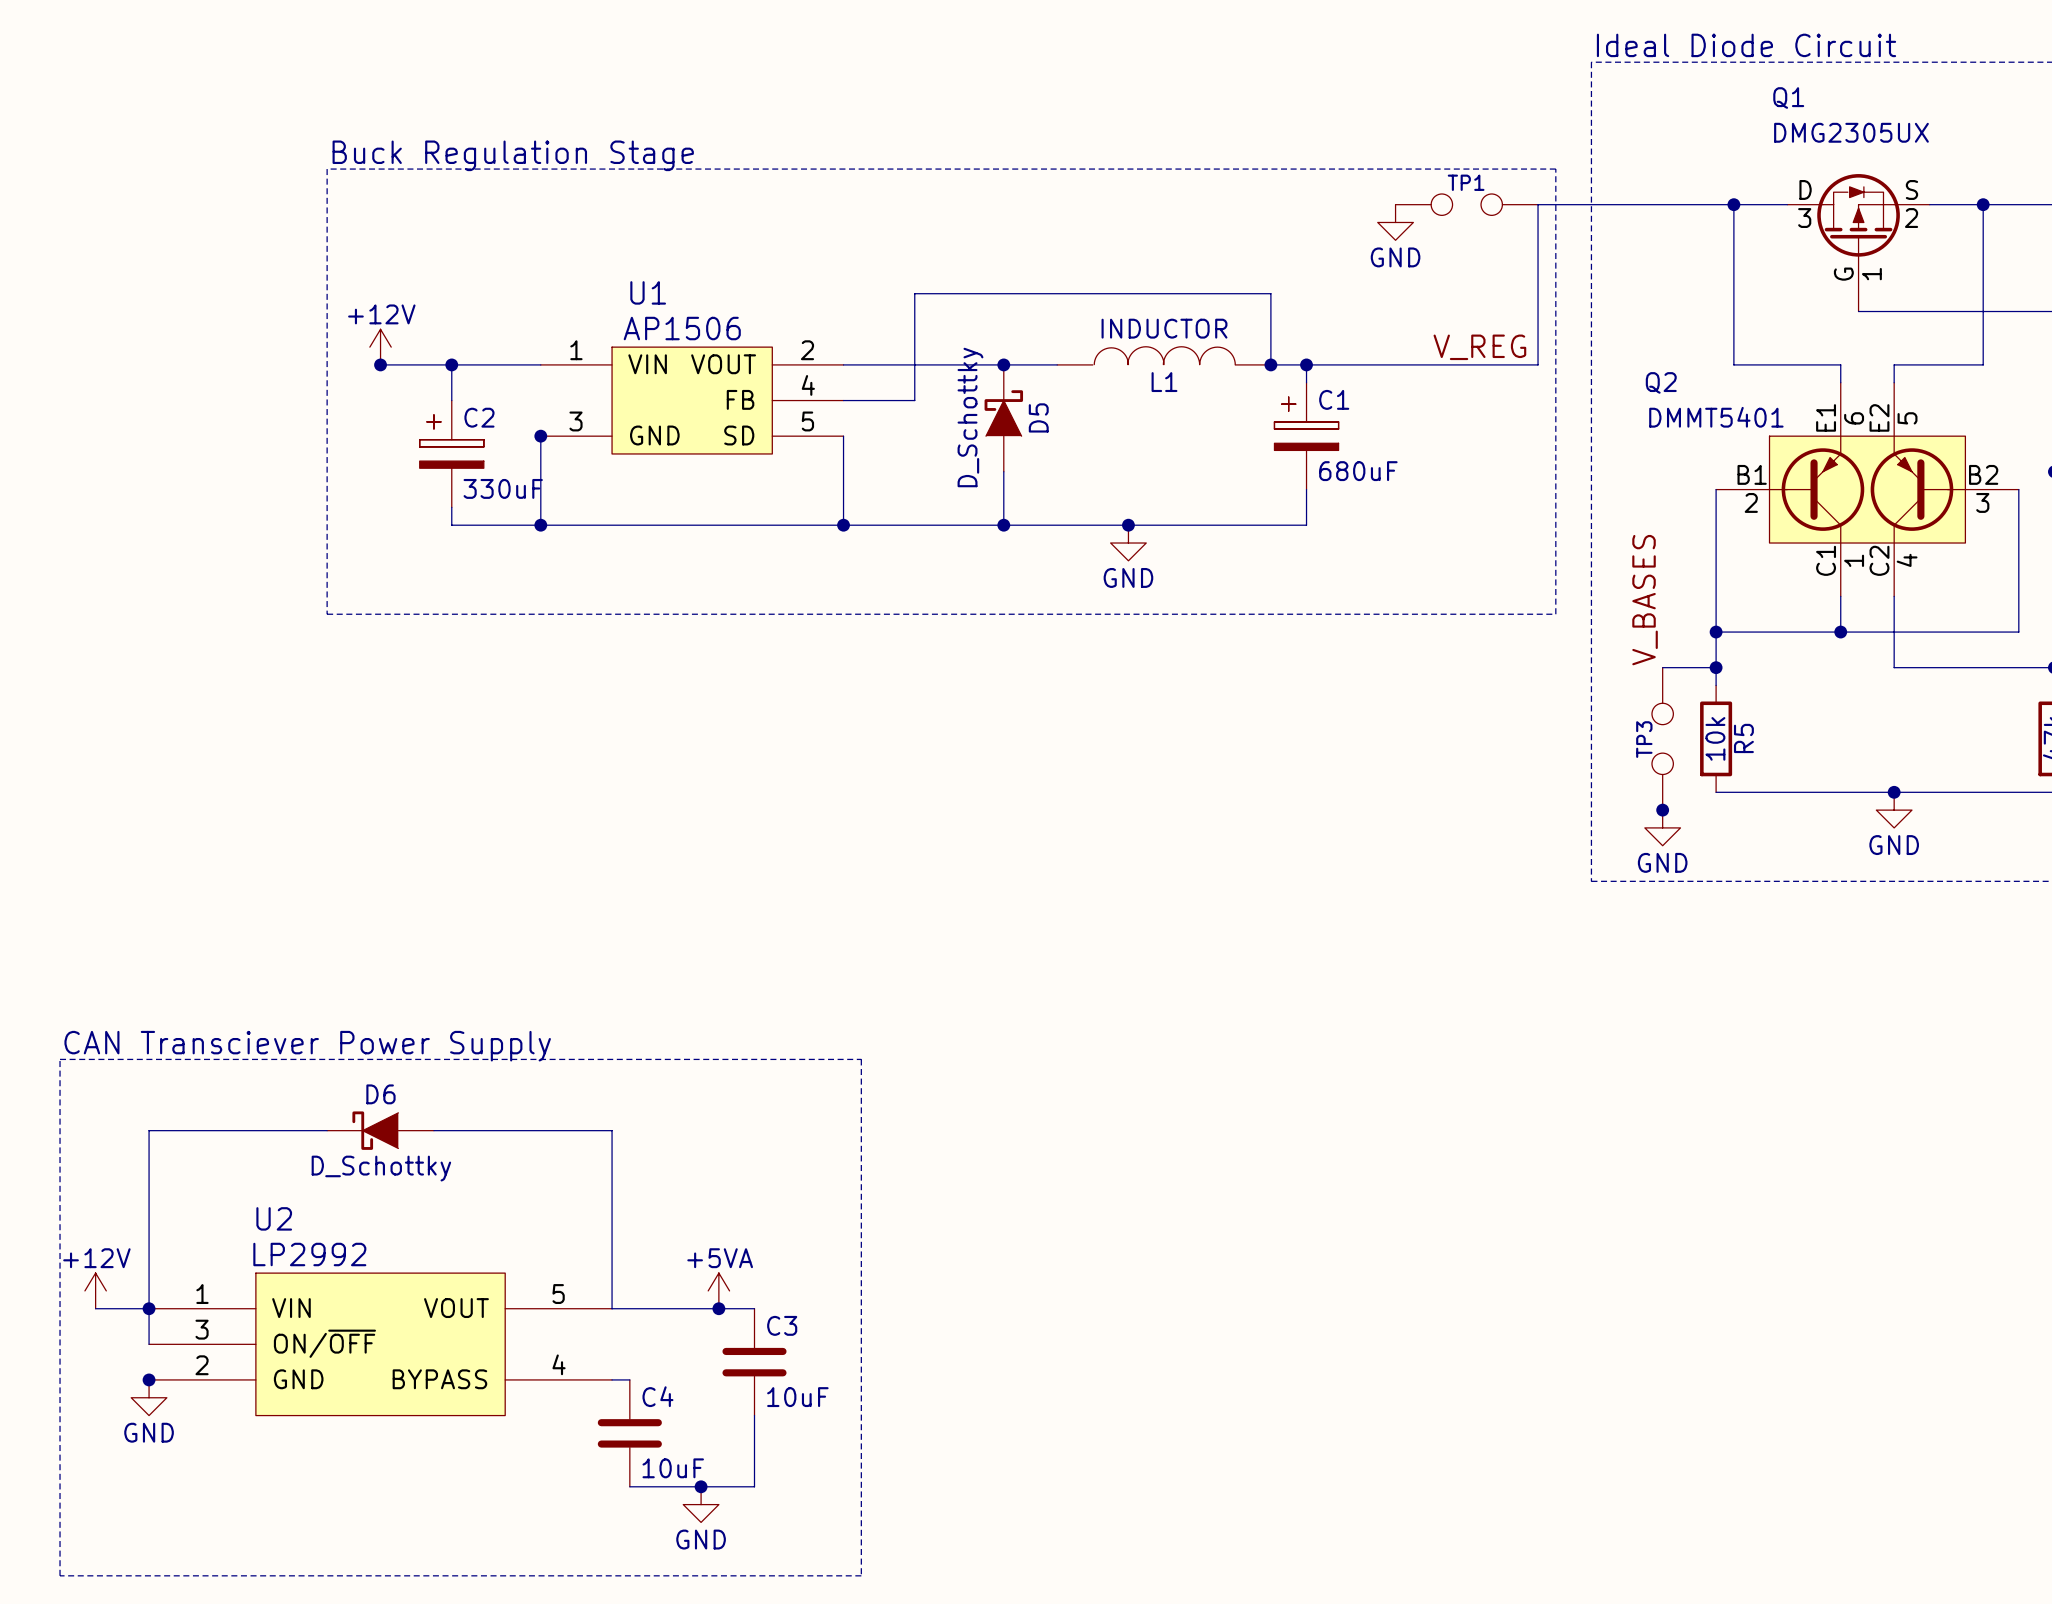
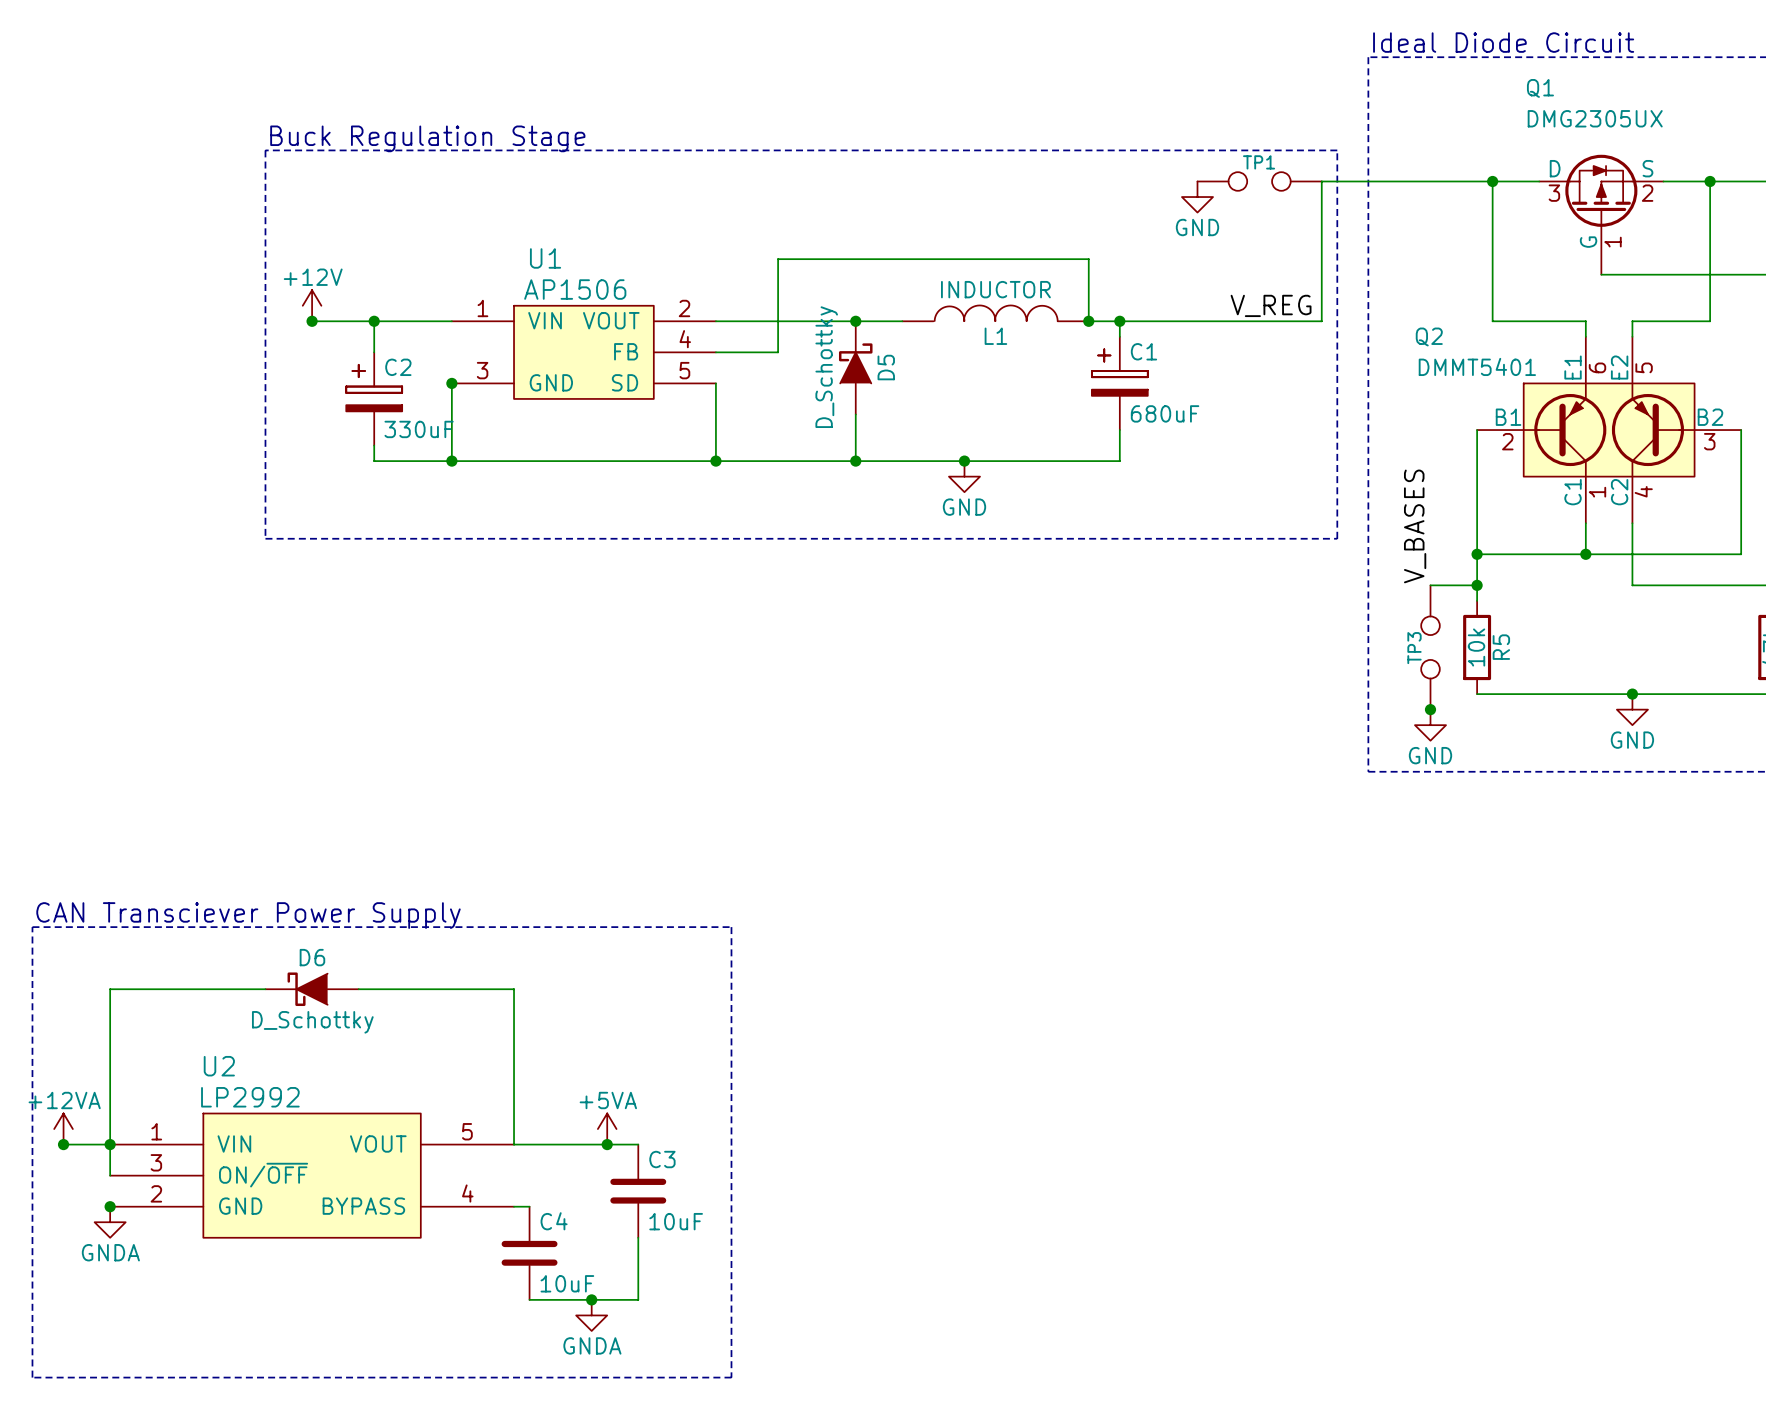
power symbol: +12V (95, 1290) -> +12VA (63, 1129)
junction: none -> (63, 1144)
power symbol: GND (149, 1397) -> GNDA (110, 1222)
power symbol: GND (701, 1504) -> GNDA (591, 1315)

